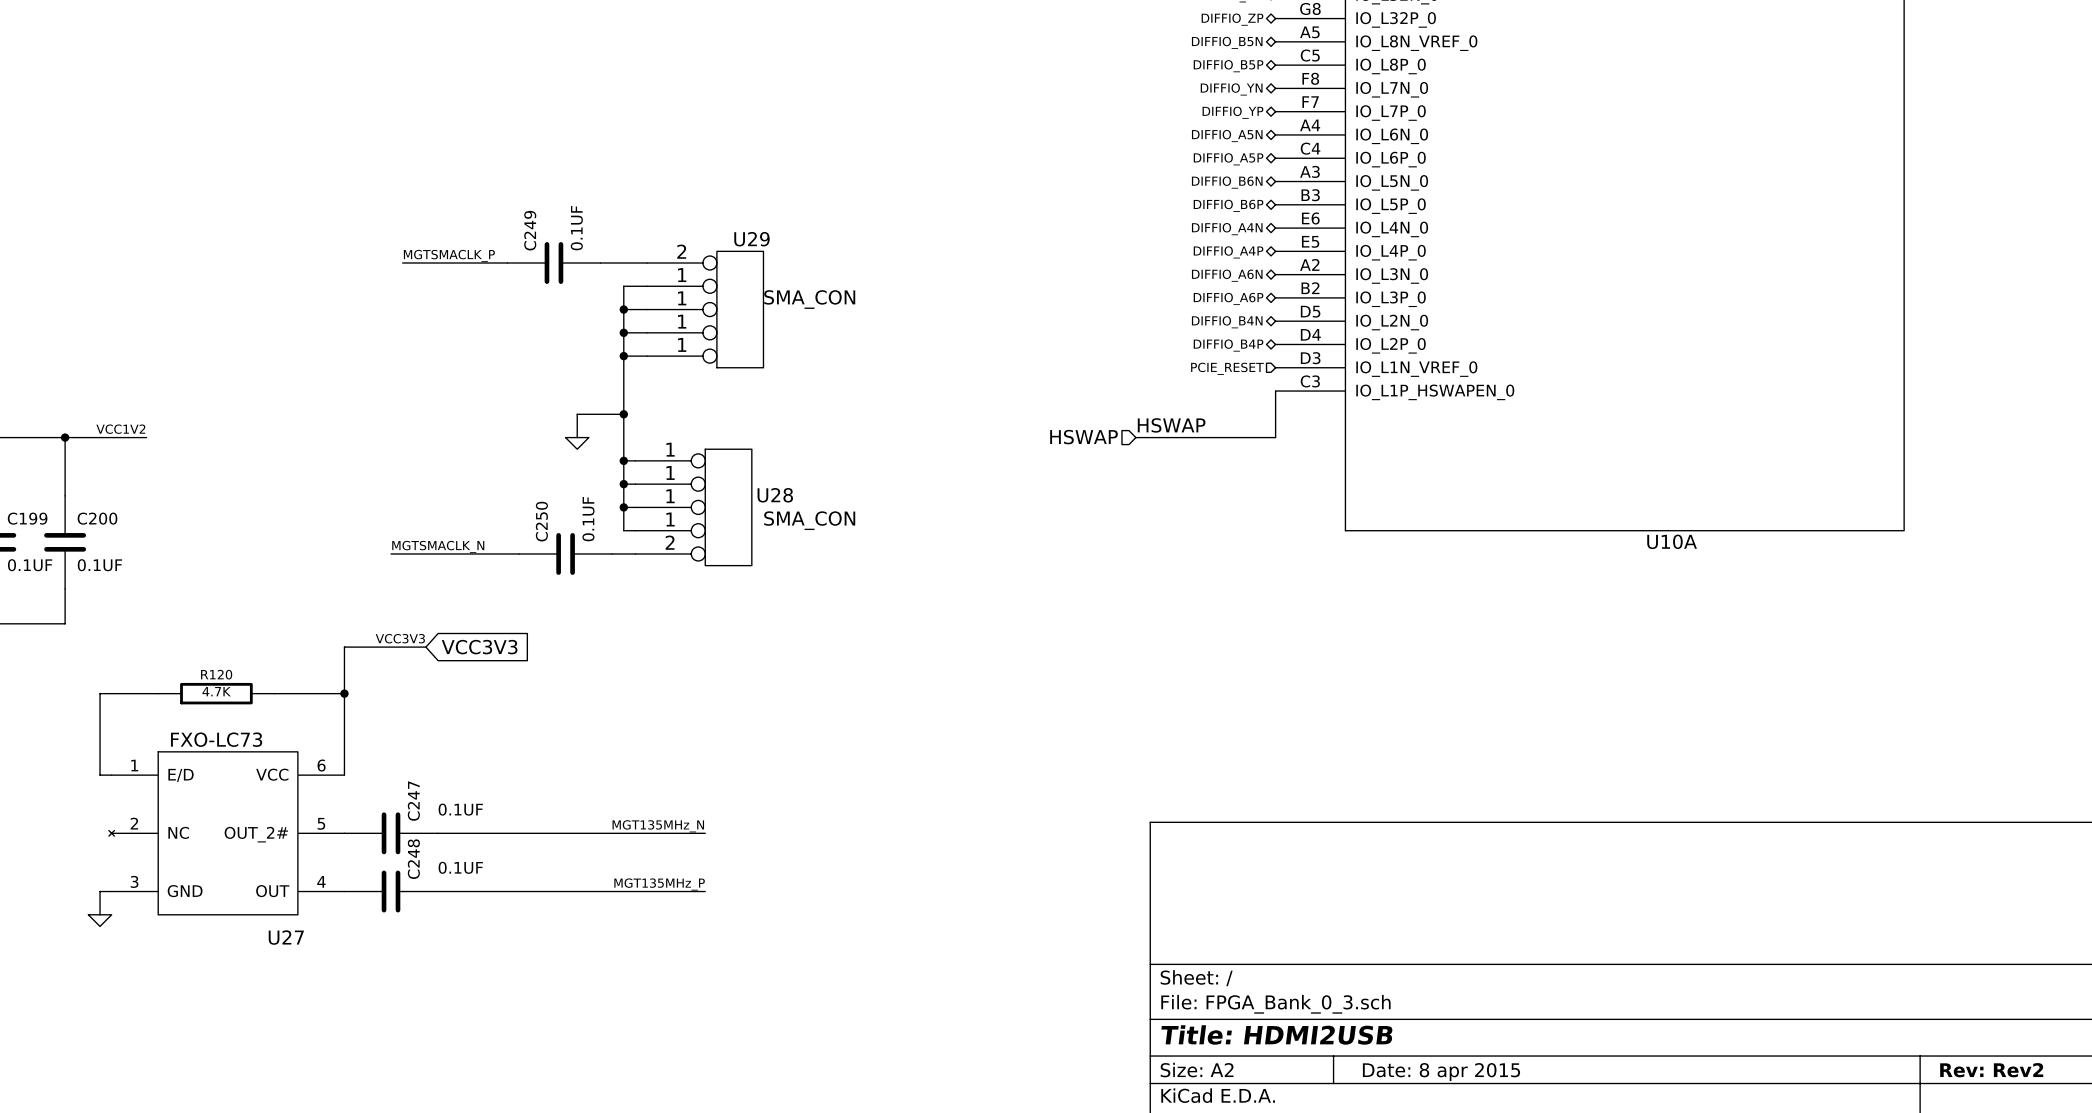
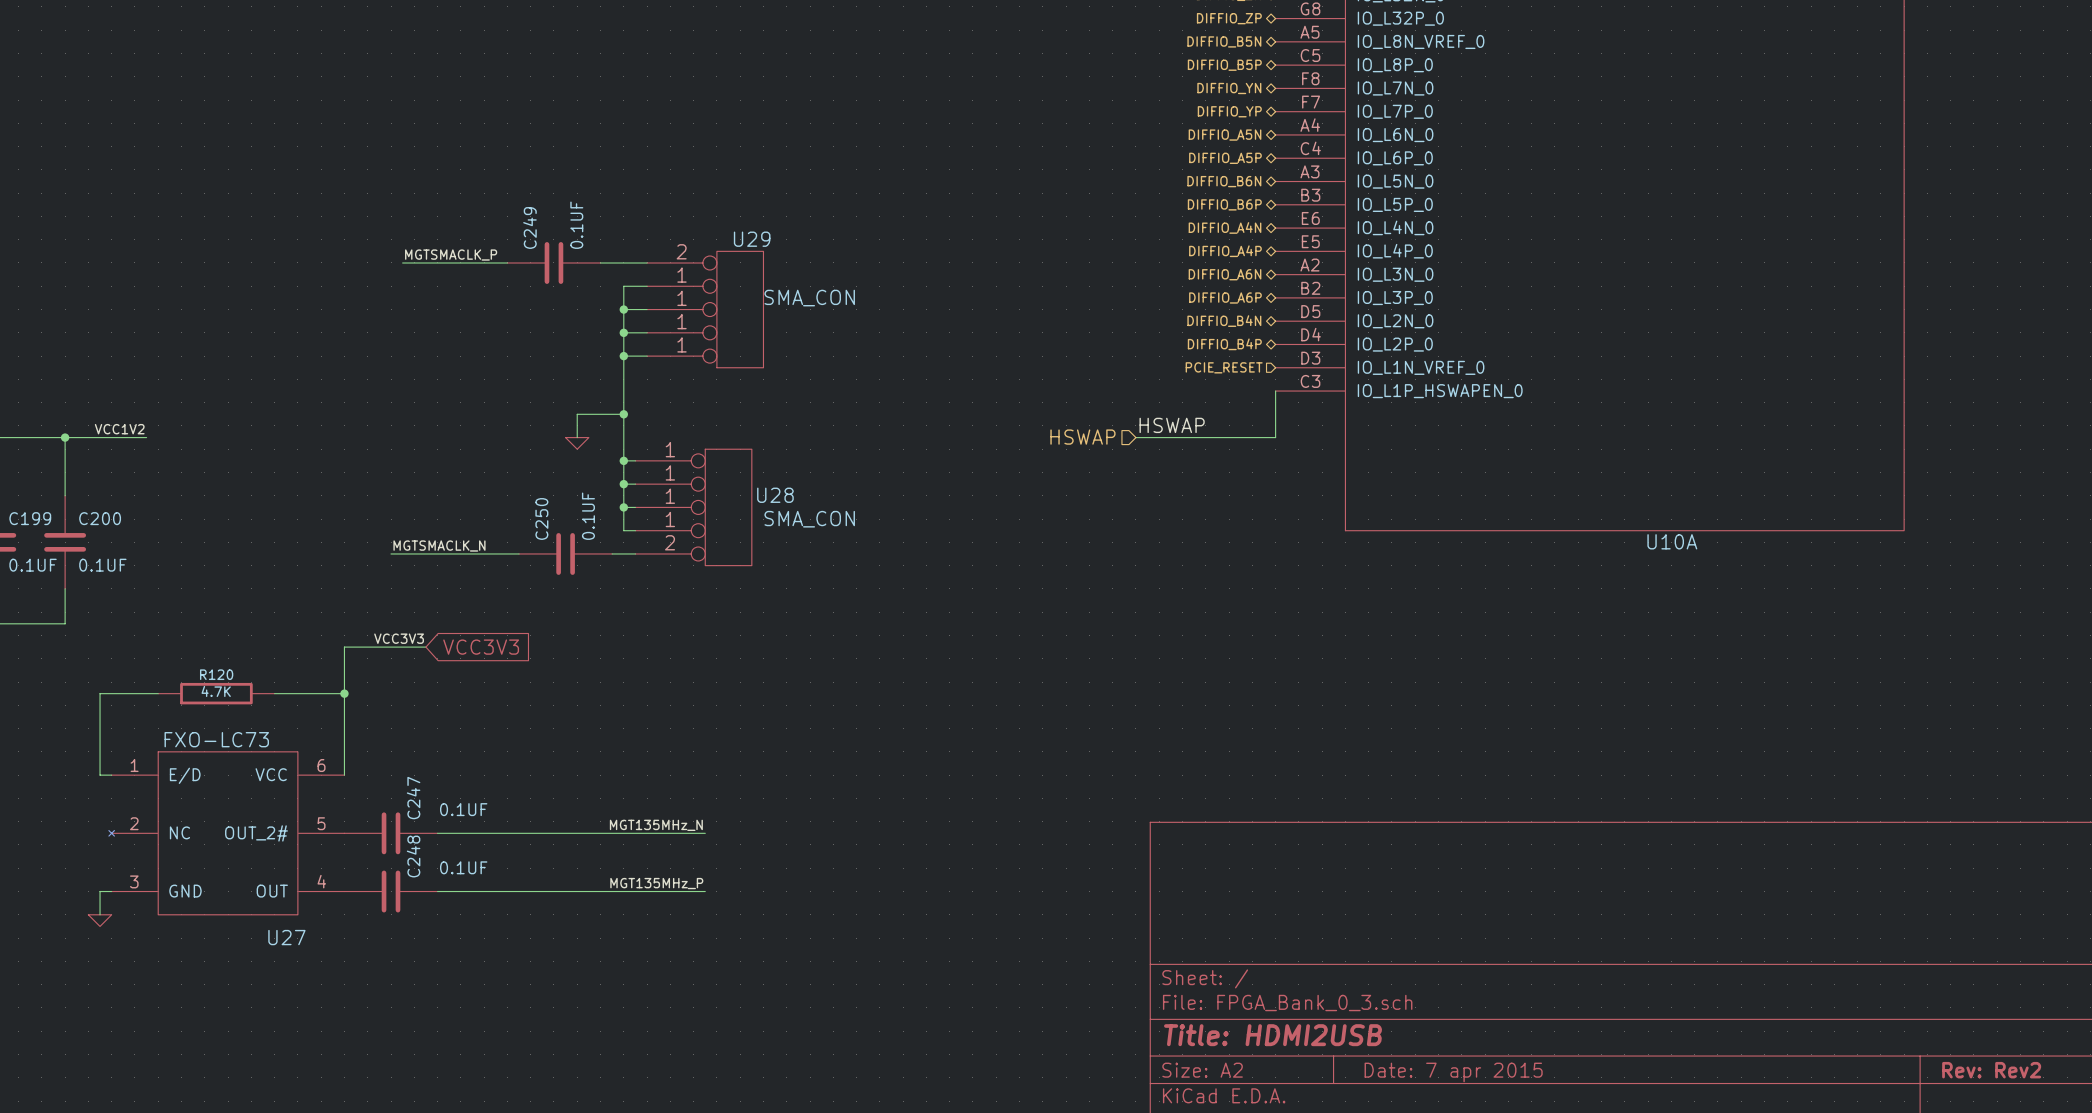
title block: Date: 8 apr 2015 (1441, 1072) -> Date: 7 apr 2015 (1453, 1072)

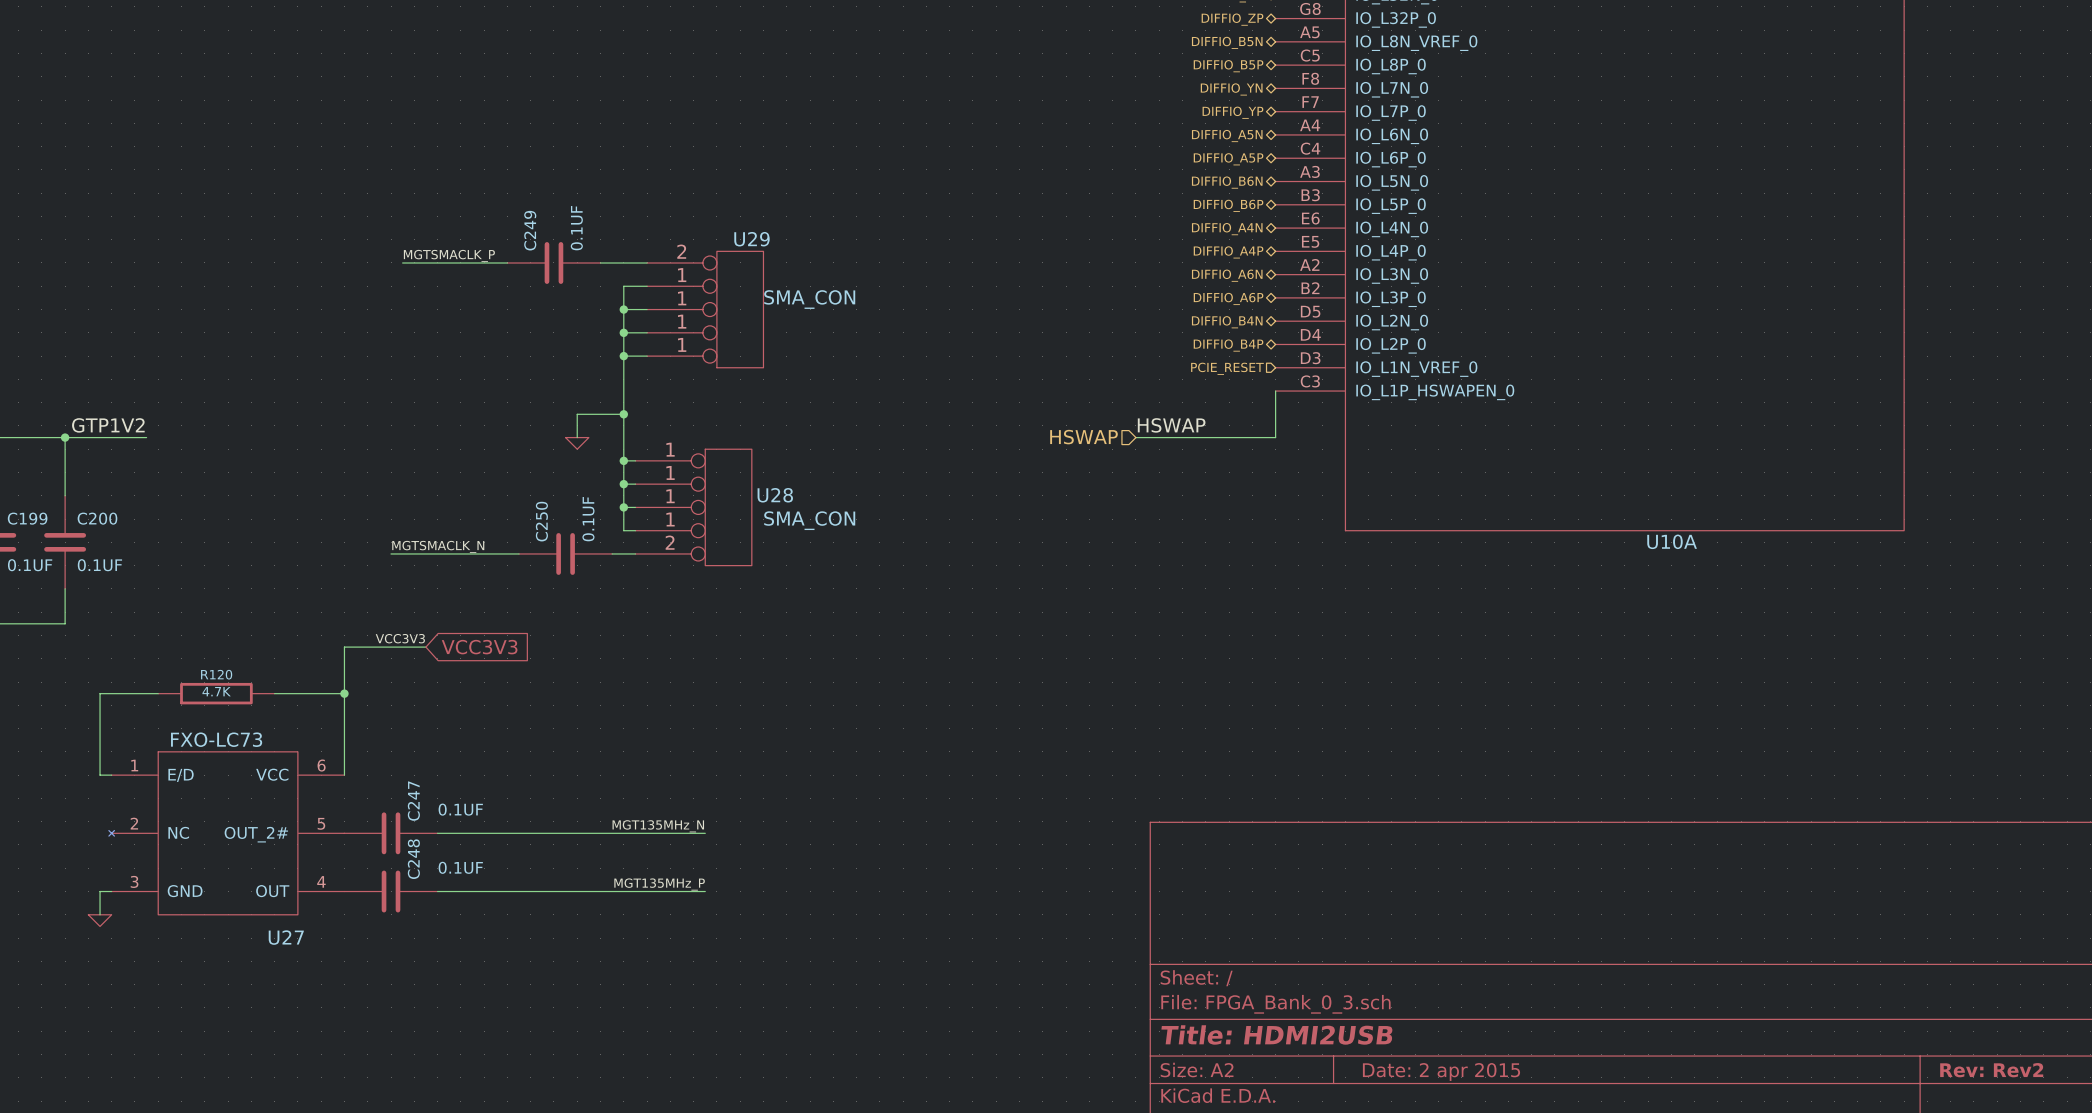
label: VCC1V2 (119, 429) -> GTP1V2 (108, 425)
title block: Date: 7 apr 2015 (1453, 1072) -> Date: 2 apr 2015 (1441, 1072)

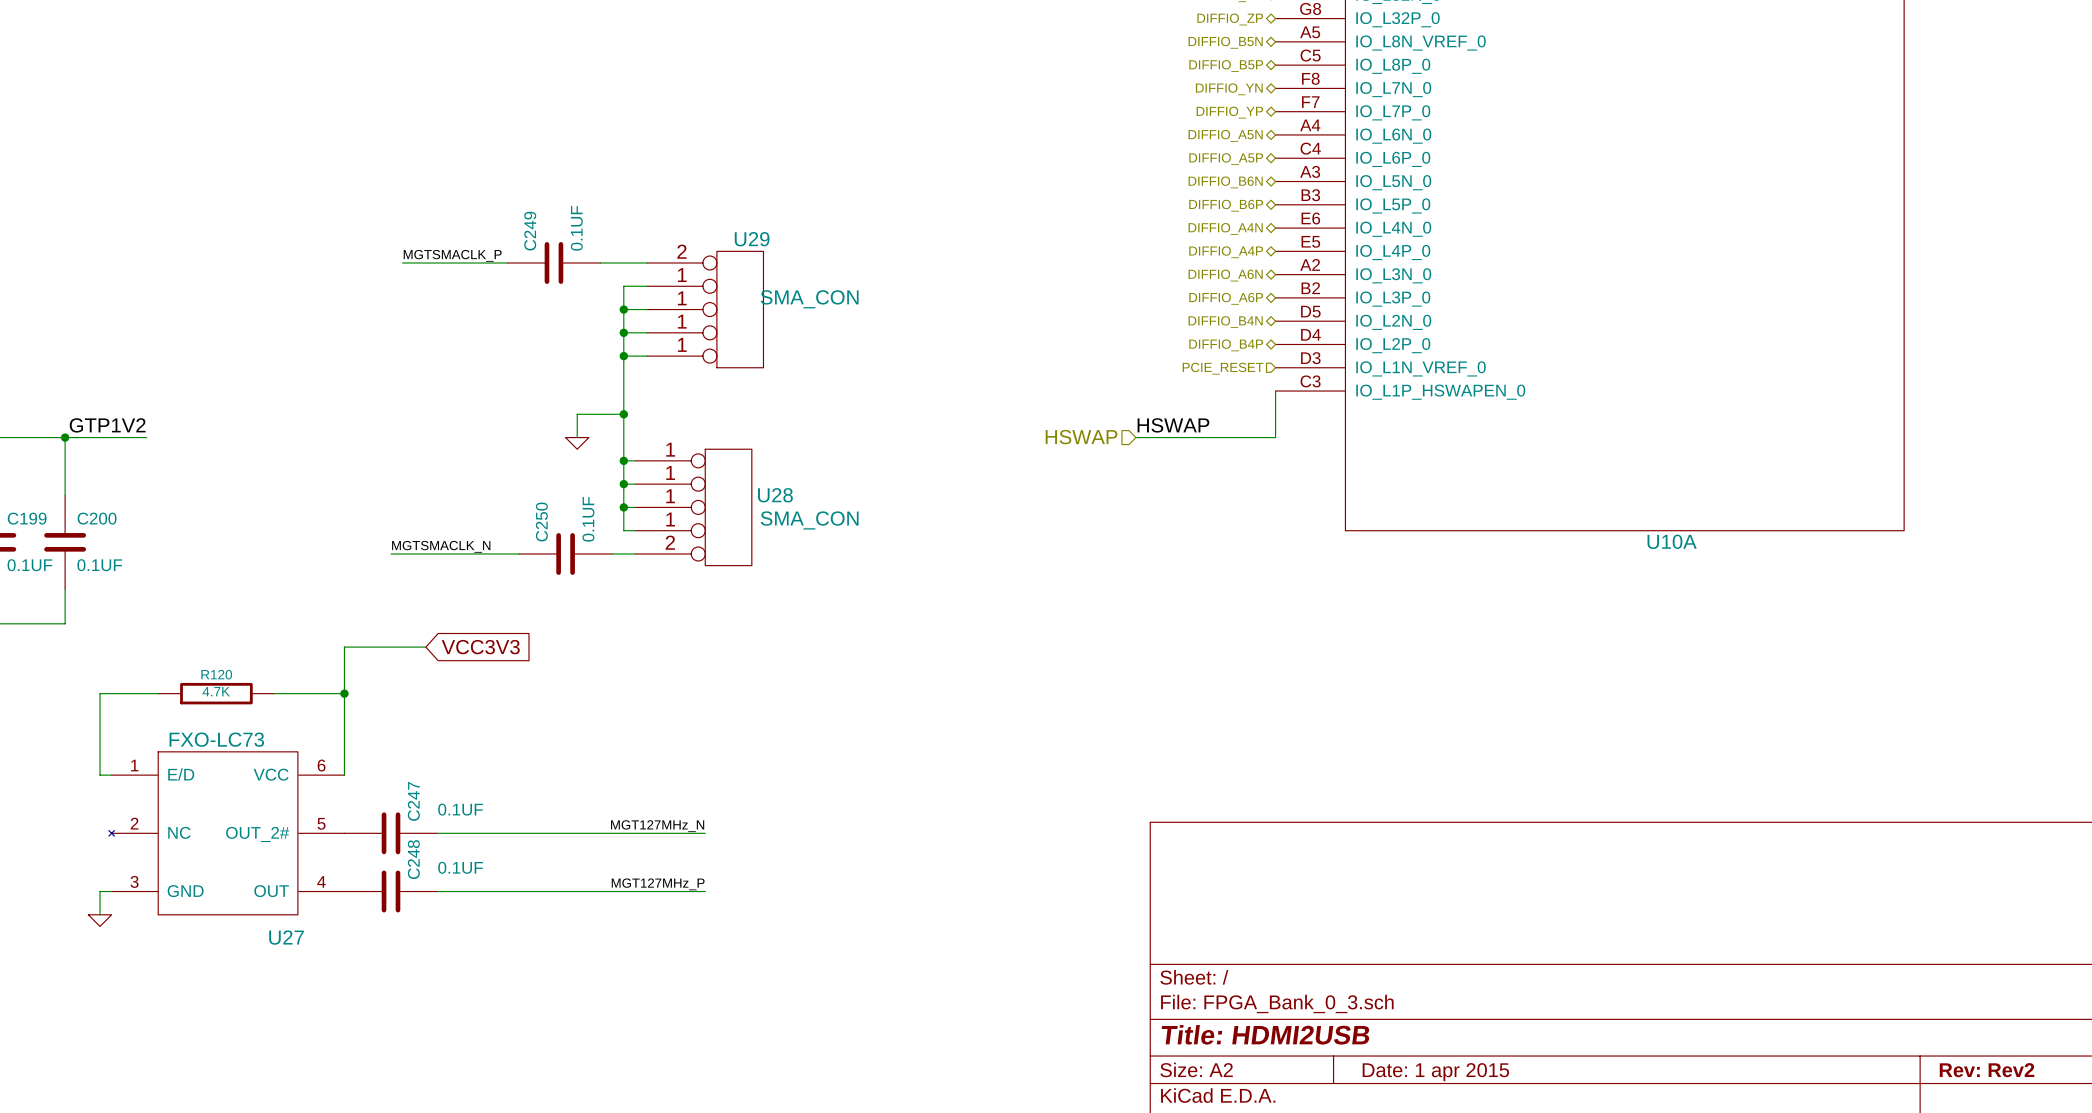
label: VCC3V3 (400, 638) -> none
label: MGT135MHz_N (658, 826) -> MGT127MHz_N (657, 826)
label: MGT135MHz_P (659, 884) -> MGT127MHz_P (658, 884)
title block: Date: 2 apr 2015 (1441, 1072) -> Date: 1 apr 2015 (1435, 1072)

